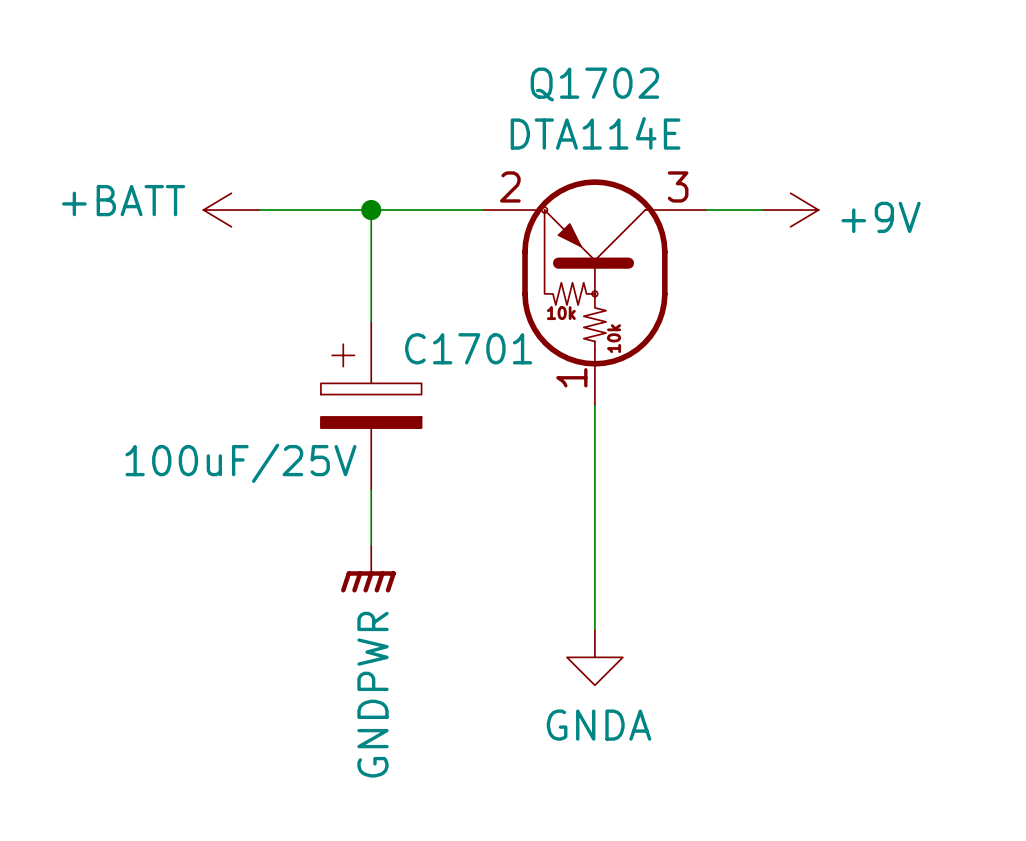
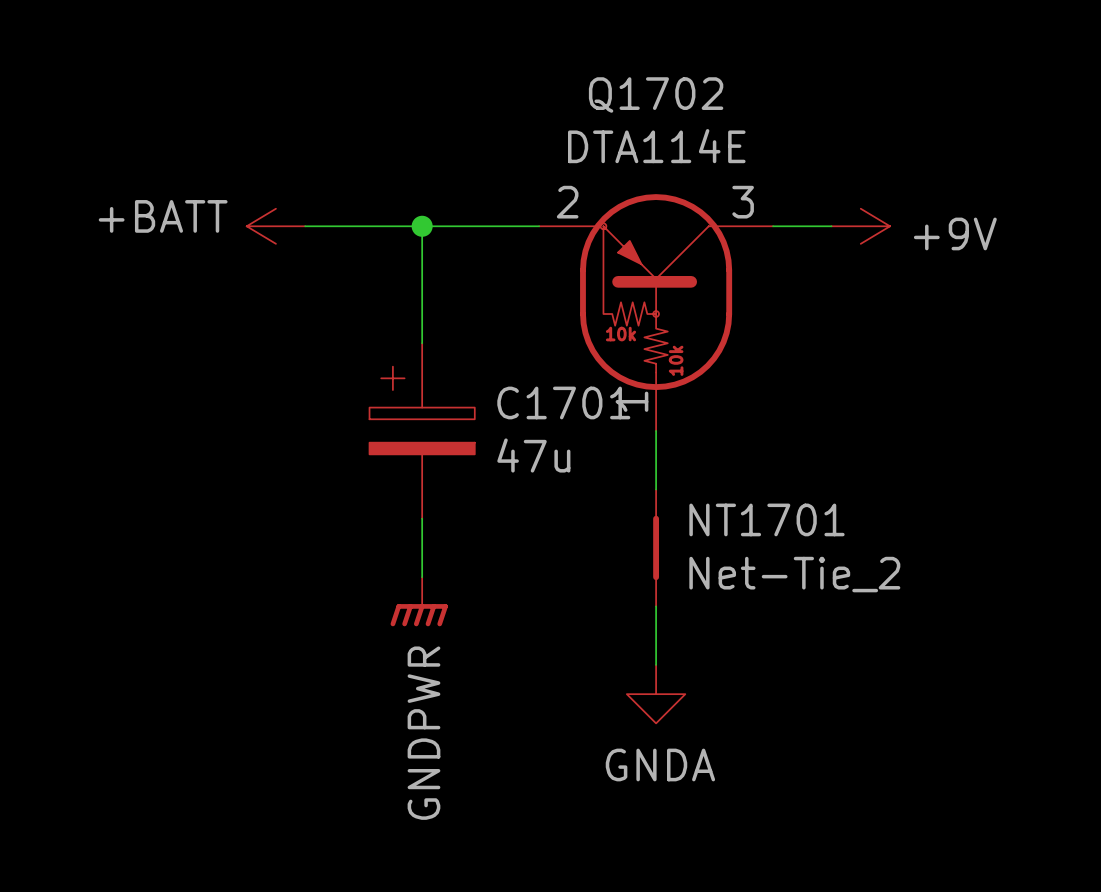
C1701 name position: C1701 (468, 348) -> C1701 (563, 402)
C1701 value: 100uF/25V (240, 463) -> 47u (533, 455)
NT1701: none -> Net-Tie_2 (656, 547)

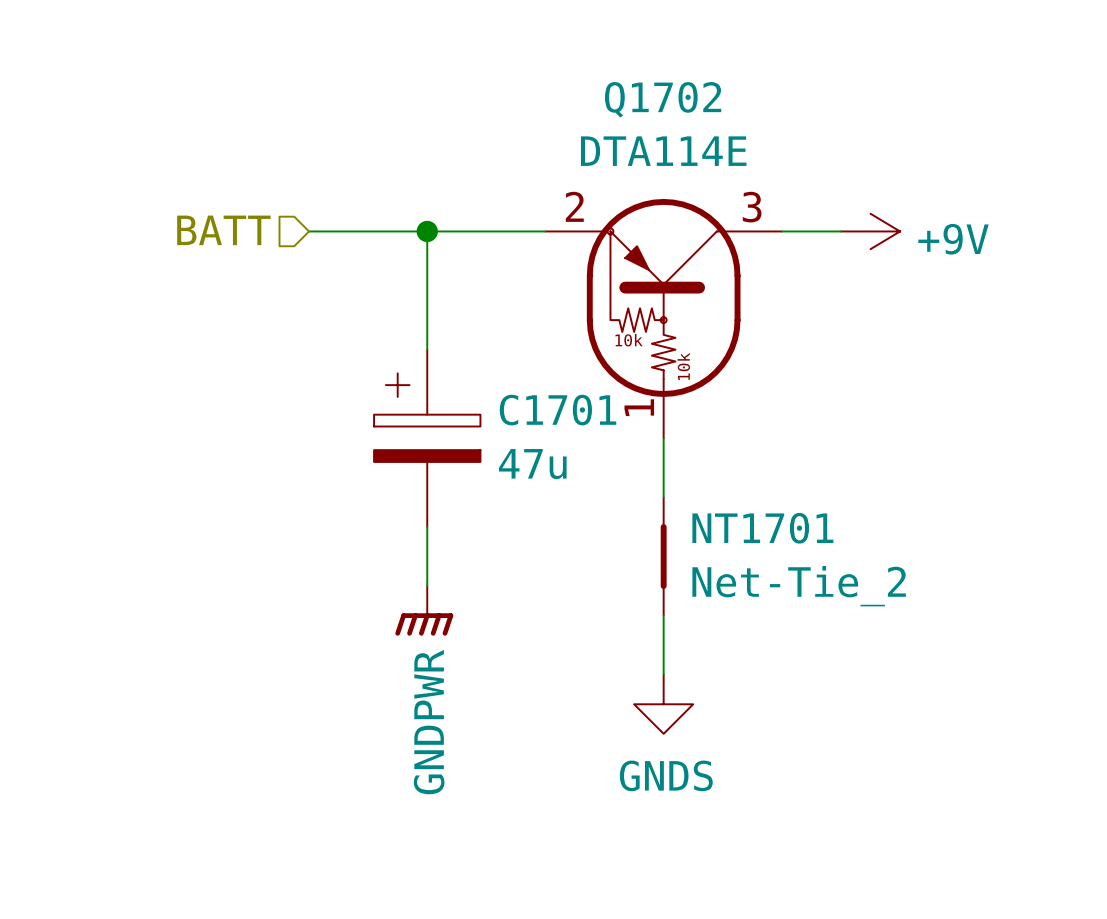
hierarchical label: none -> BATT (223, 230)
power symbol: +BATT (275, 226) -> none
power symbol: GNDA (656, 694) -> GNDS (663, 704)

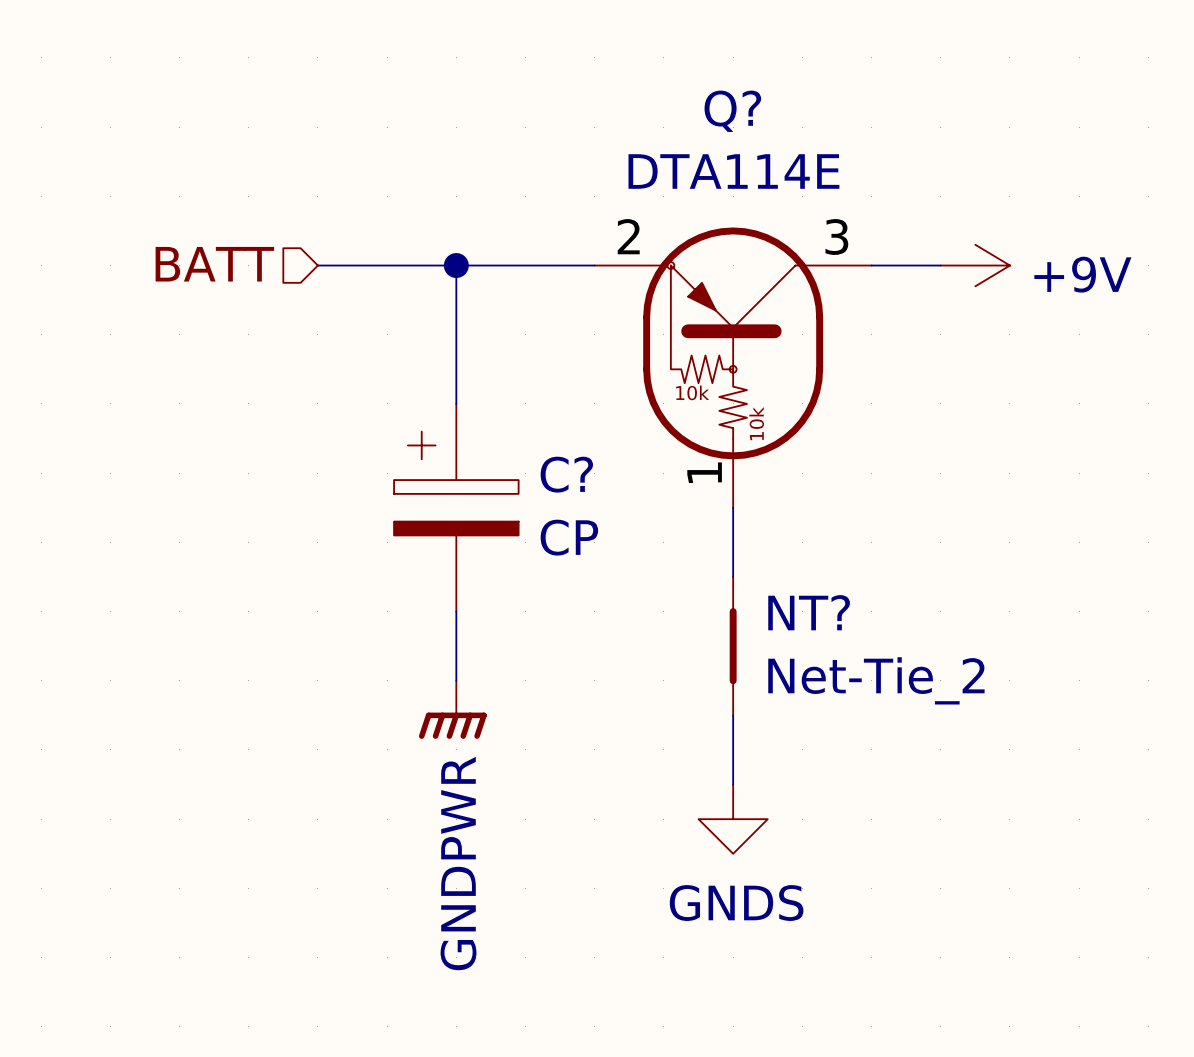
Q1702 name: Q1702 (663, 99) -> Q? (732, 111)
C1701 name: C1701 (558, 410) -> C? (566, 474)
C1701 value: 47u (532, 464) -> CP (569, 537)
NT1701 name: NT1701 (762, 528) -> NT? (809, 612)

